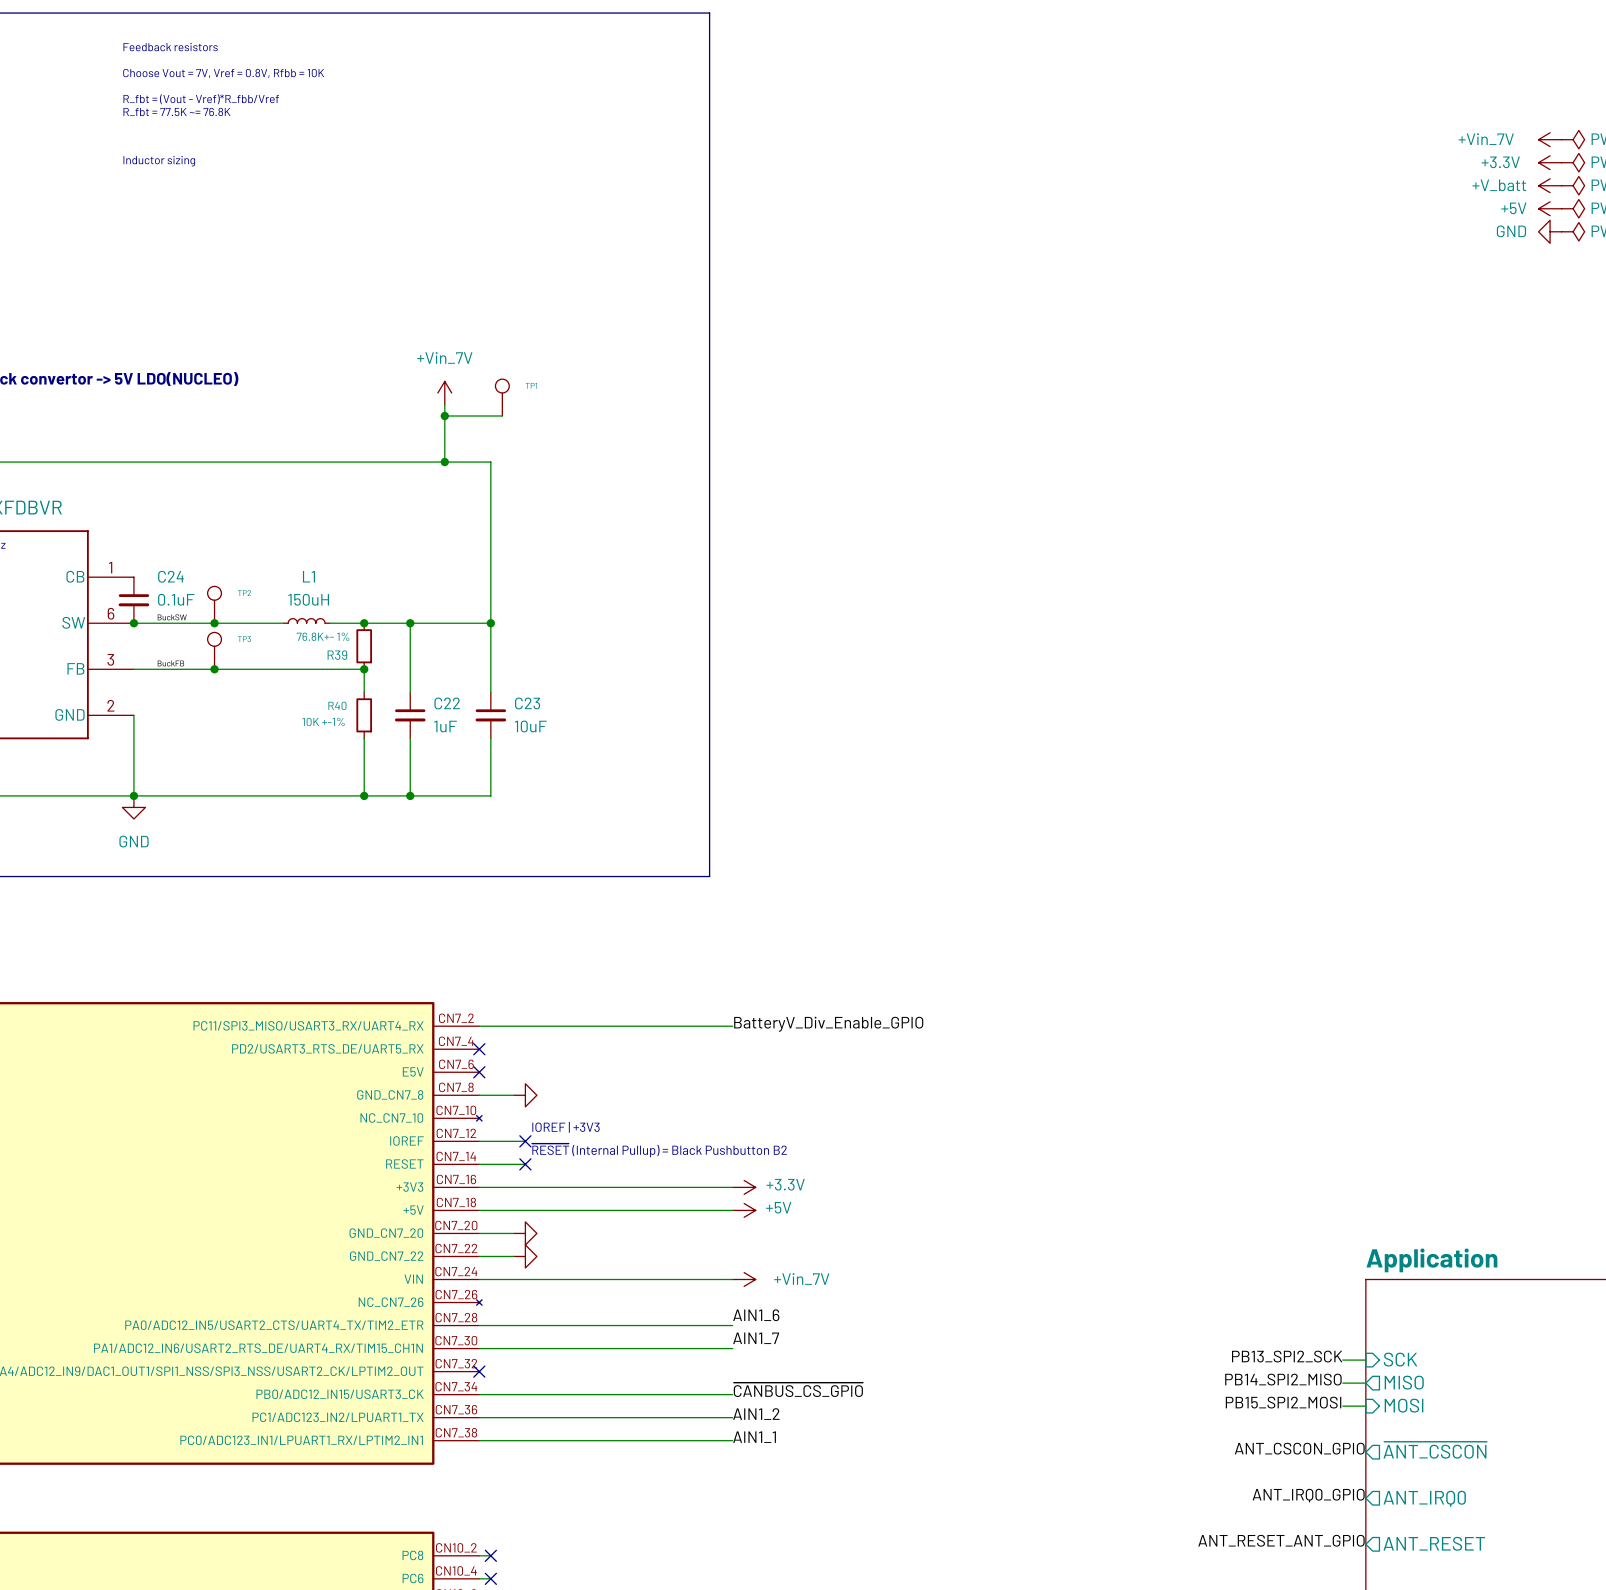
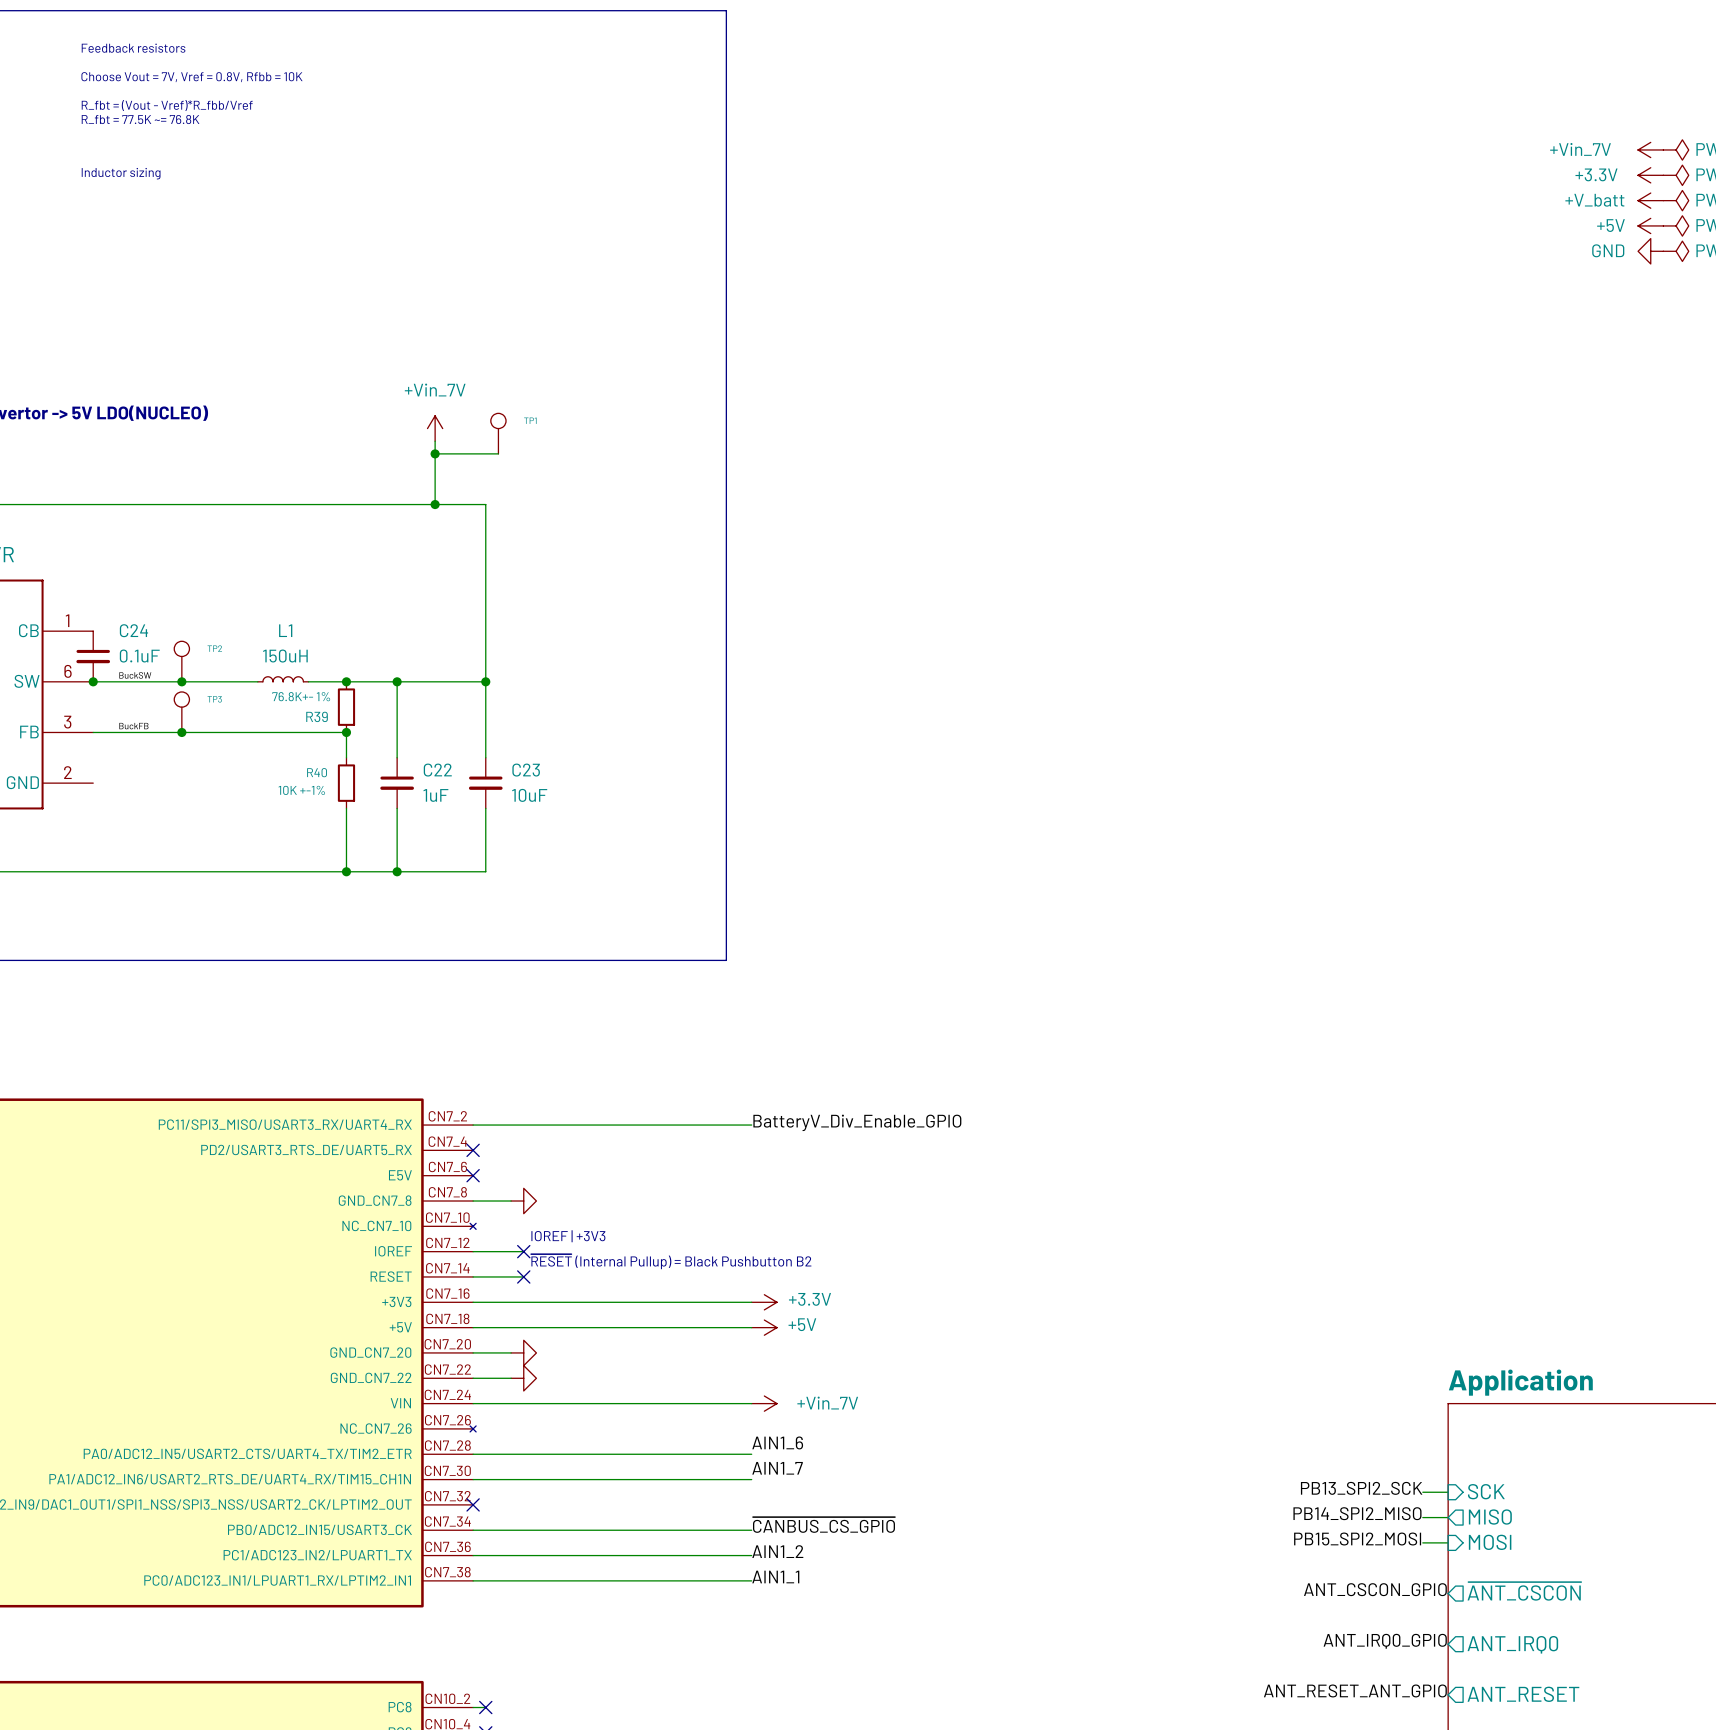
wire: (133, 715) (133, 795) -> none
junction: (133, 795) -> none
power symbol: GND (133, 807) -> none

